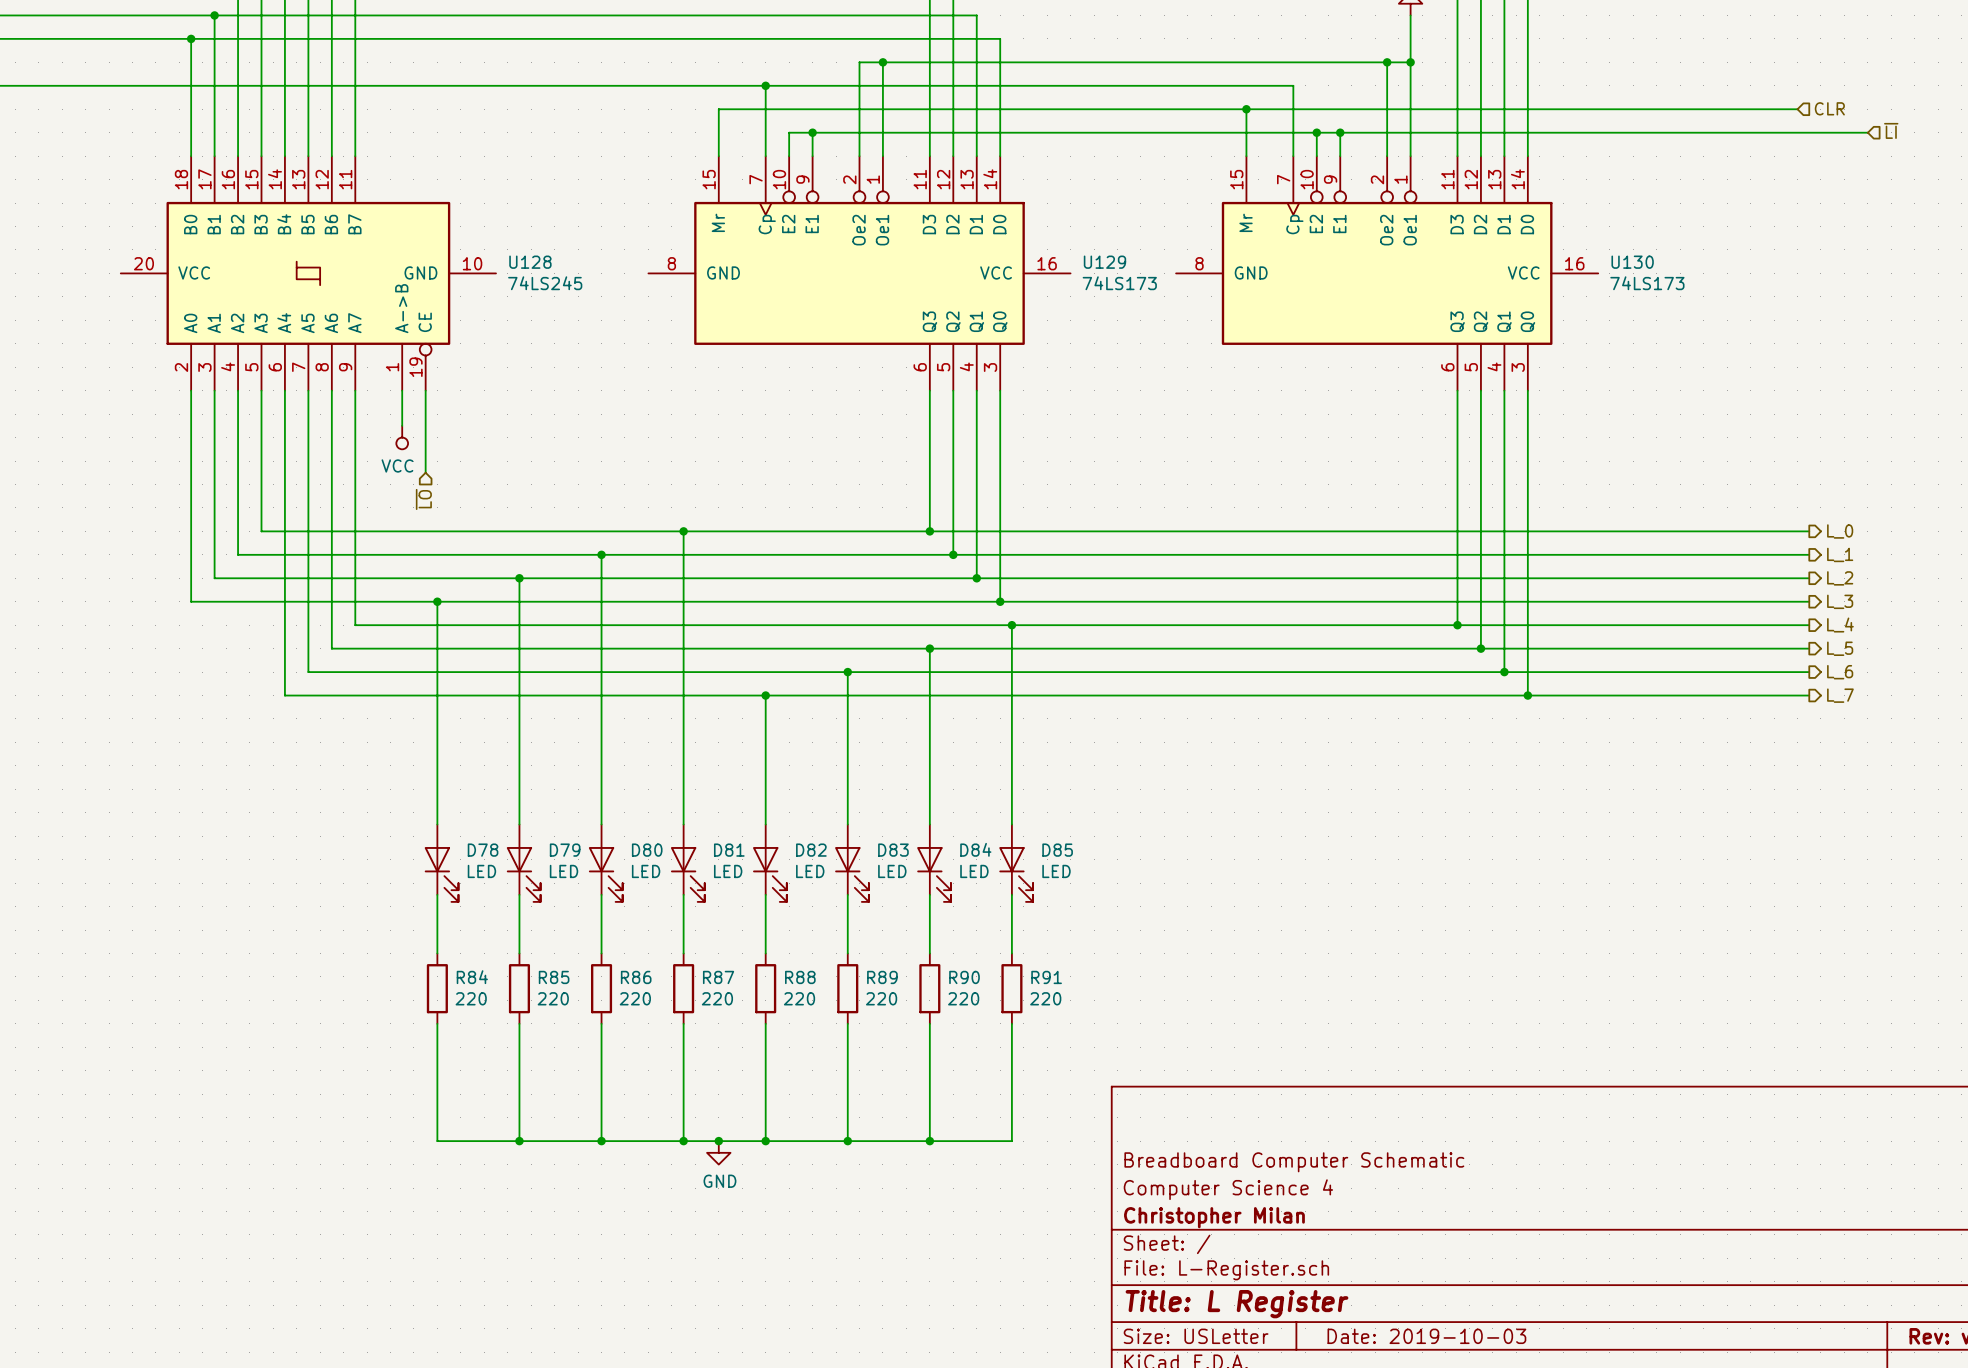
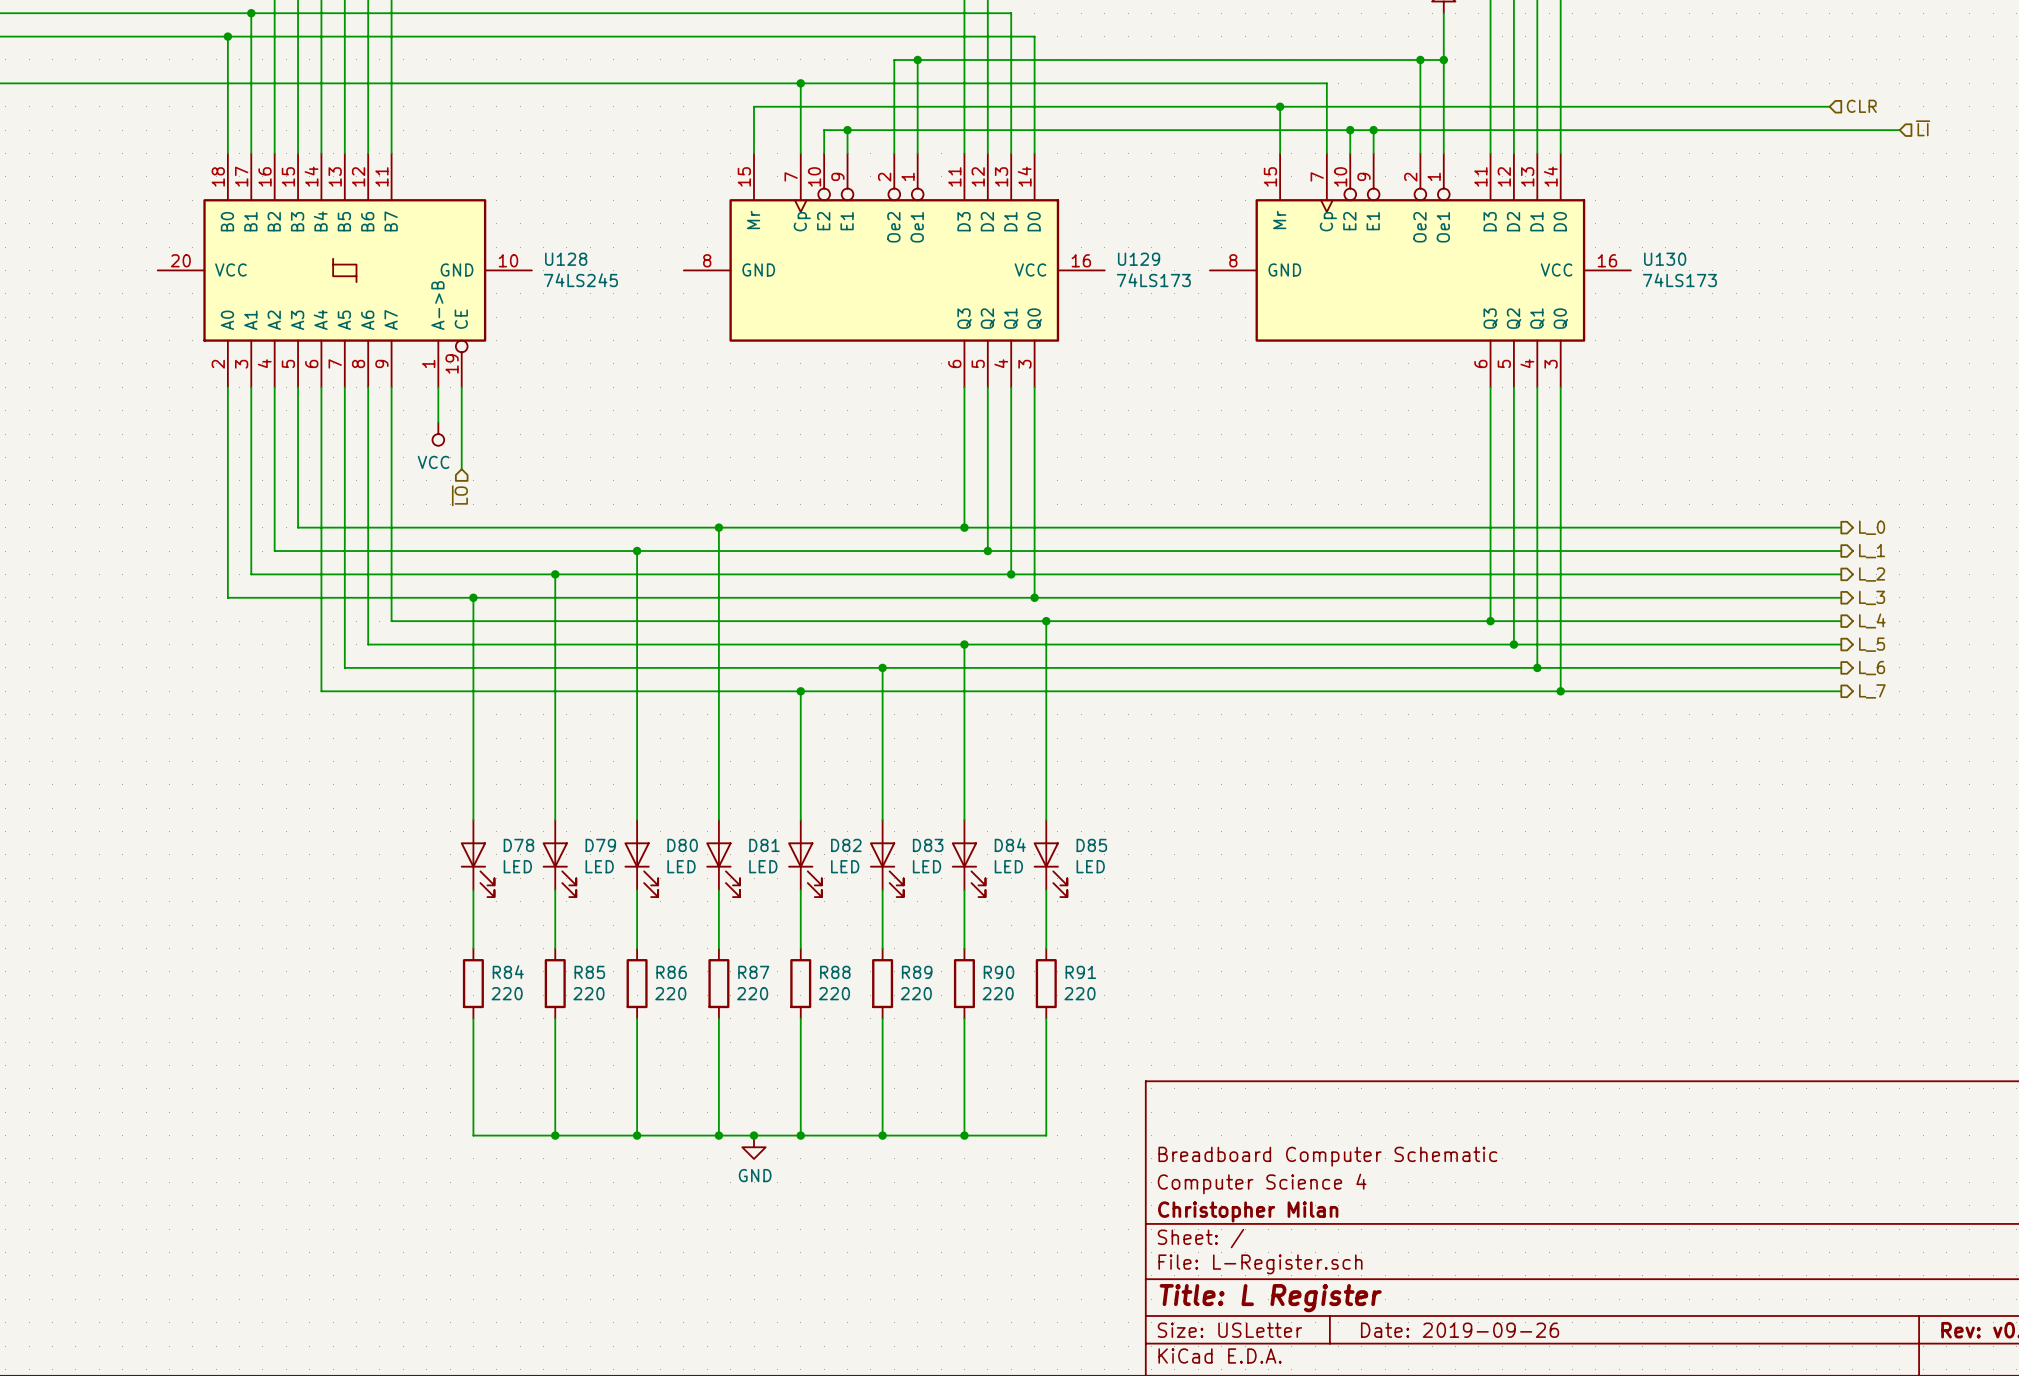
title block: Date: 2019-10-03 (1426, 1336) -> Date: 2019-09-26 (1460, 1330)

